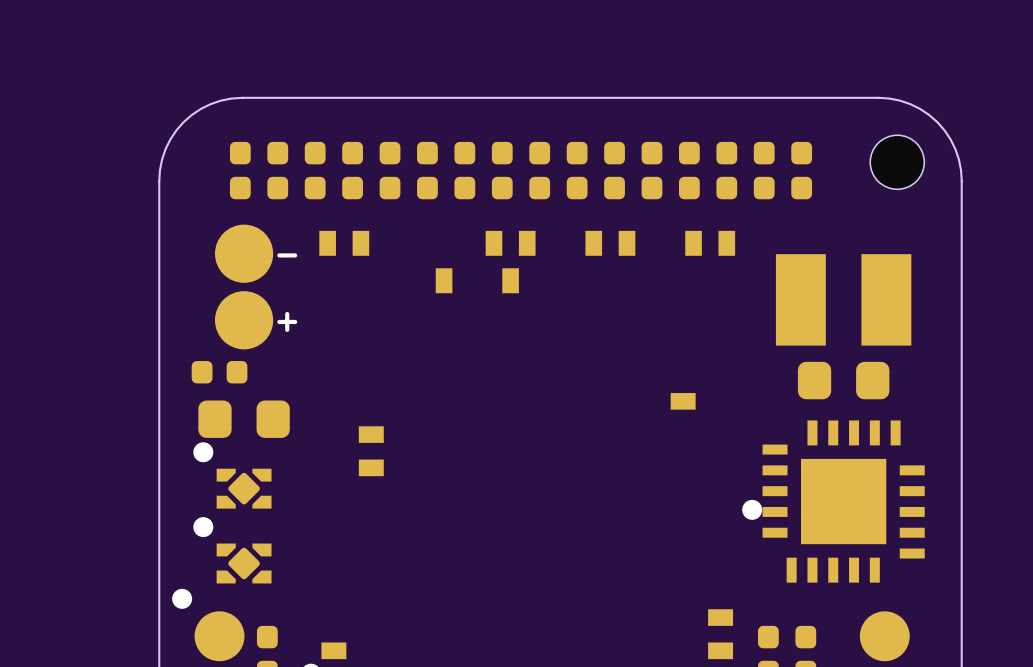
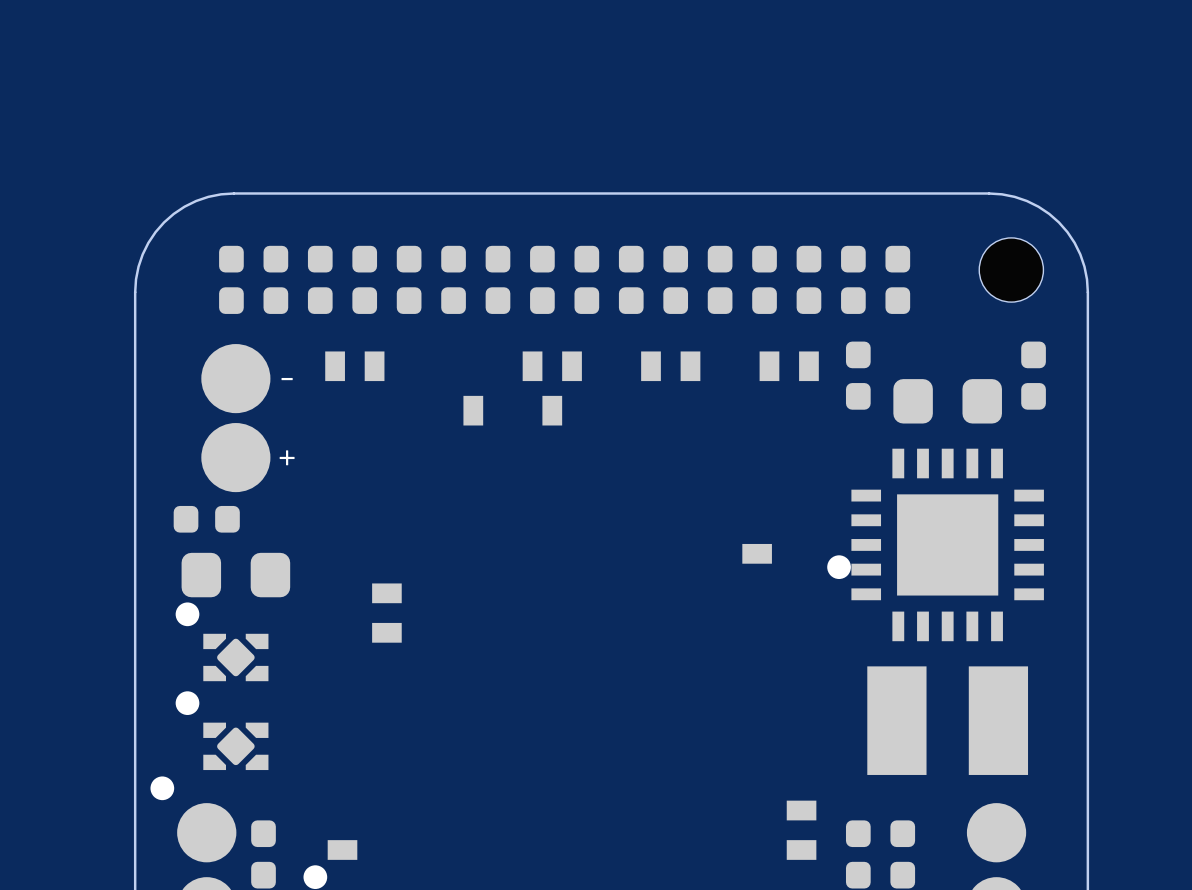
part: none -> (858, 375)
part: none -> (1033, 375)
part footprint: [775, 254, 912, 346] -> [893, 379, 1002, 424]
part footprint: [797, 361, 890, 400] -> [851, 448, 1044, 642]
part footprint: [762, 420, 925, 583] -> [867, 666, 1029, 775]
drawing position: (752, 509) -> (839, 567)

